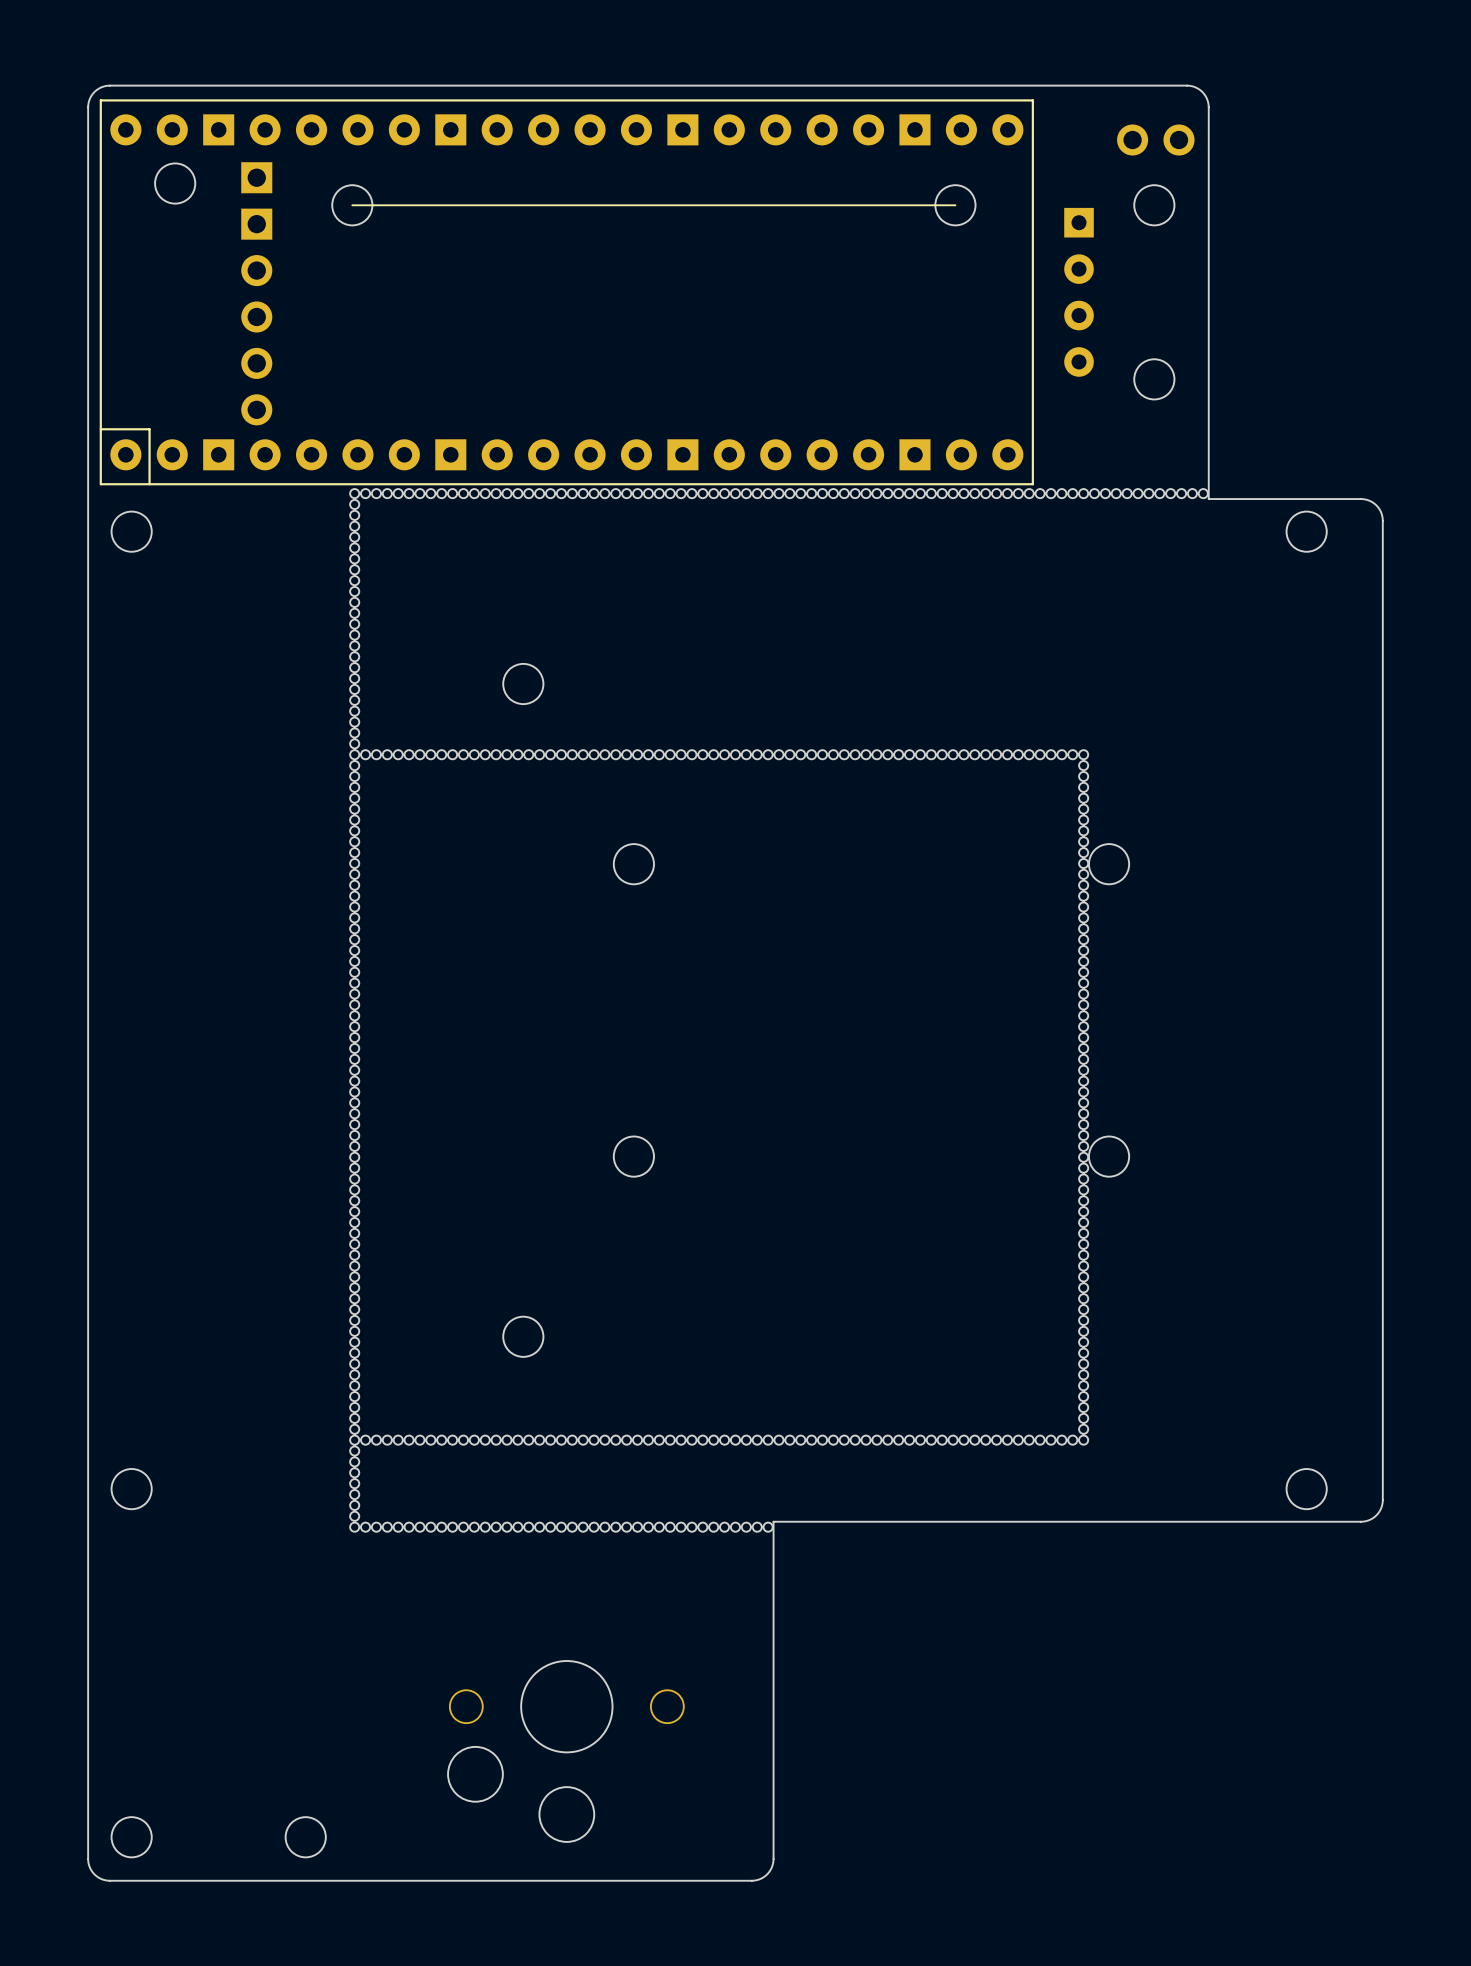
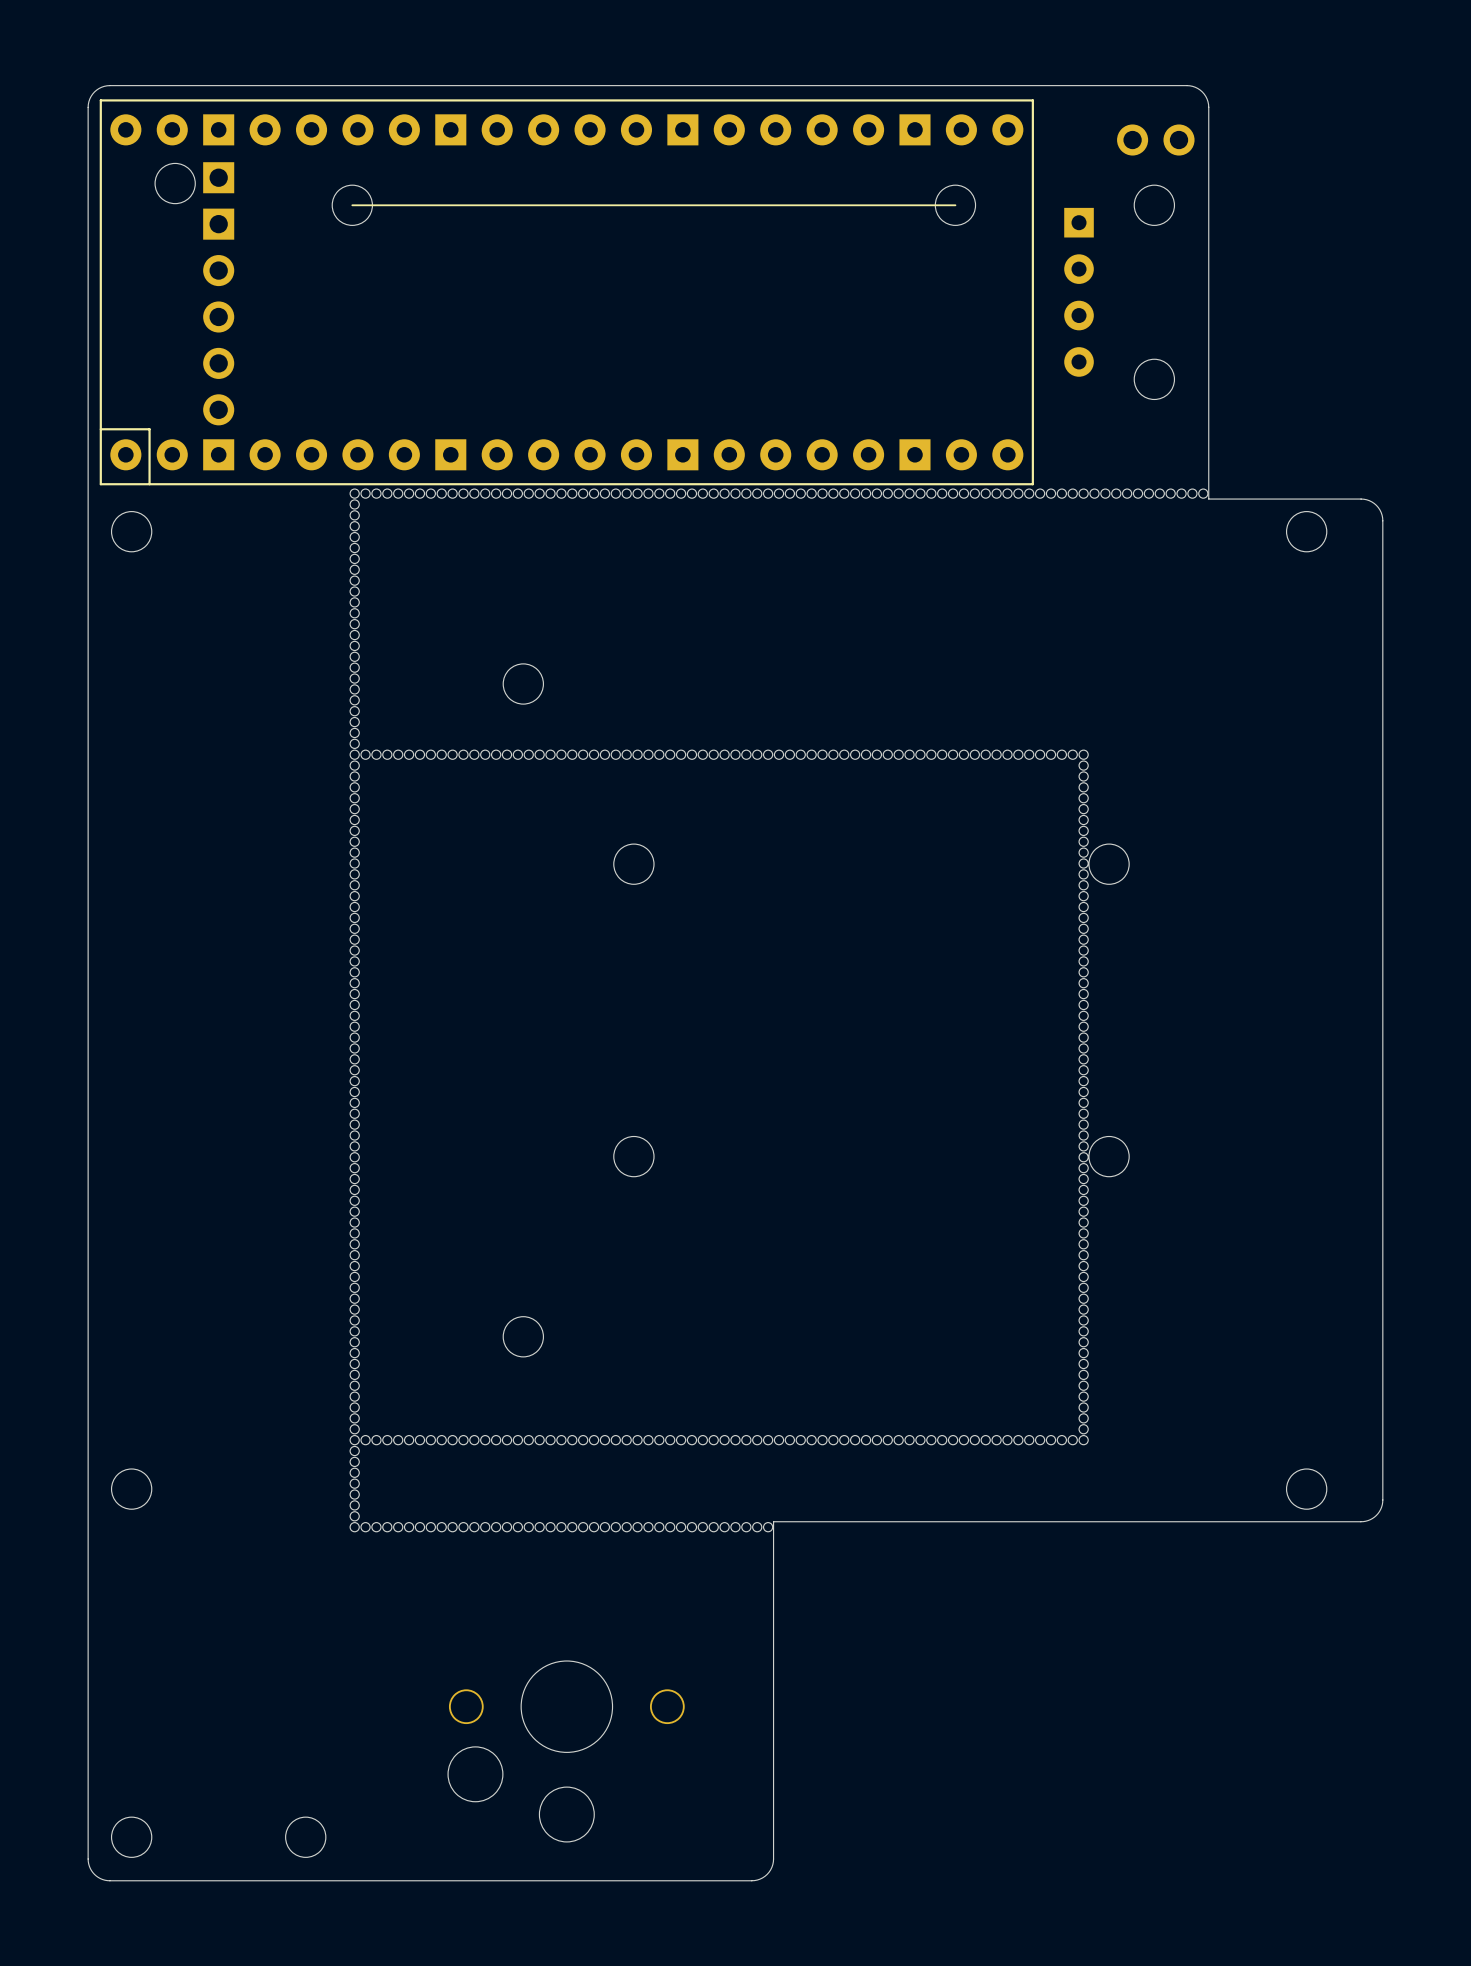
part position: (256, 293) -> (218, 293)

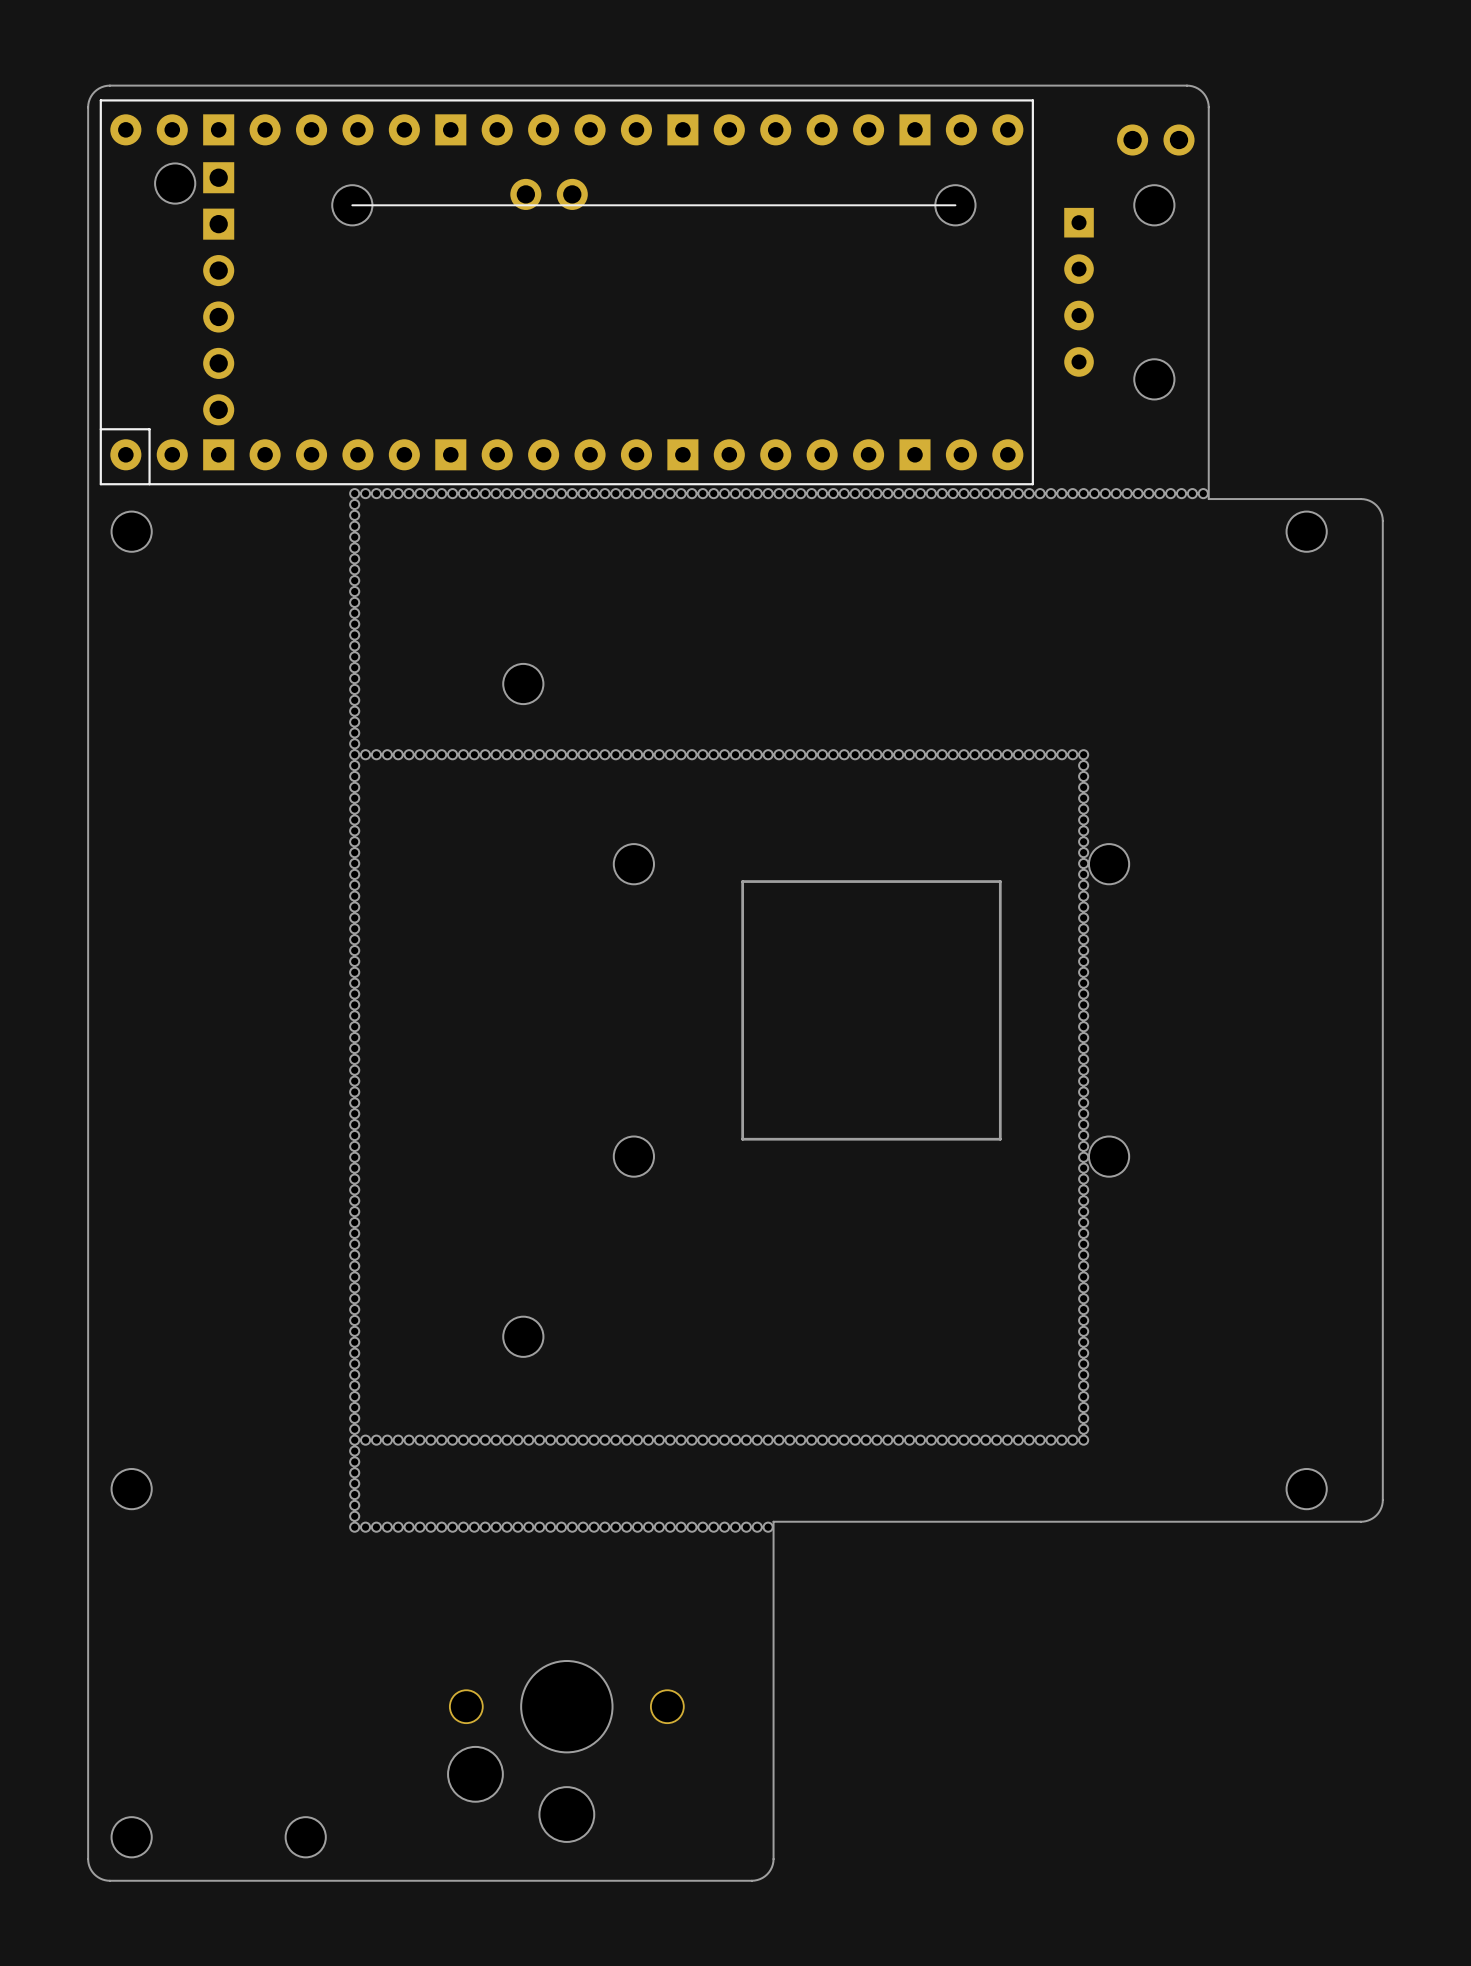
part: none -> (549, 194)
drawing: none -> [741, 880, 1002, 1141]

